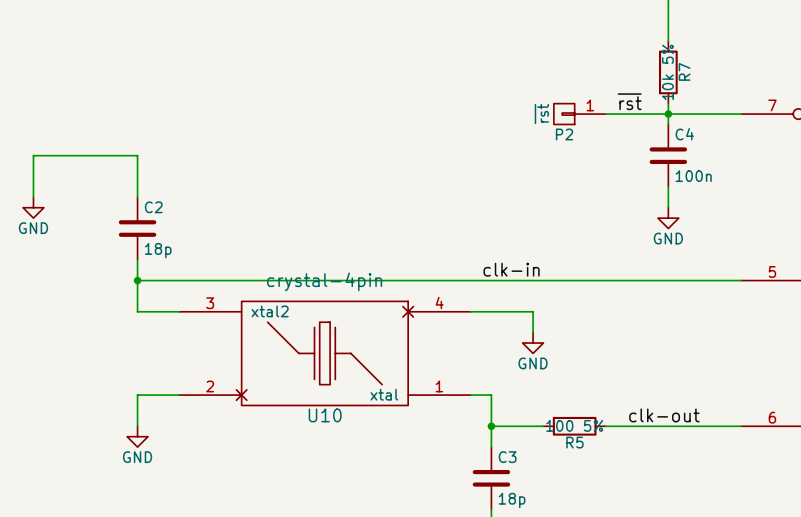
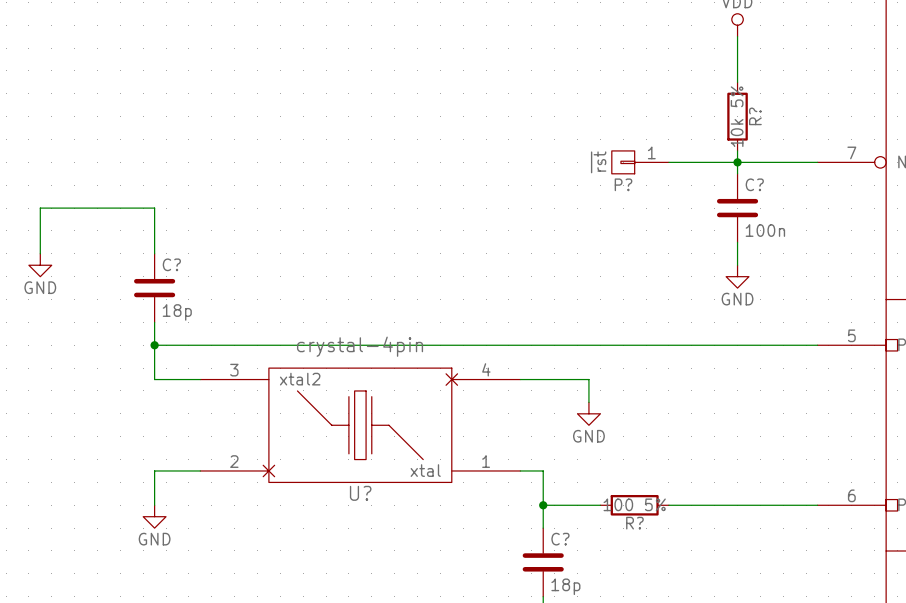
R7 name: R7 (684, 71) -> R? (755, 116)
label: ~{rst} (629, 101) -> none
P2 name: P2 (564, 134) -> P? (623, 184)
C4 name: C4 (684, 134) -> C? (754, 184)
C2 name: C2 (153, 207) -> C? (171, 264)
label: clk-in (511, 269) -> none
U10 name: U10 (325, 415) -> U? (360, 493)
label: clk-out (664, 415) -> none
R5 name: R5 (574, 442) -> R? (634, 523)
C3 name: C3 (507, 457) -> C? (560, 539)

